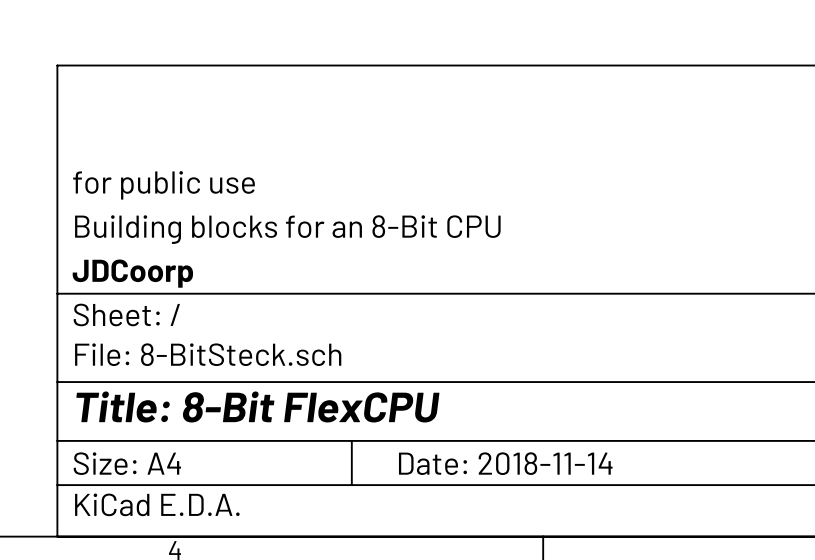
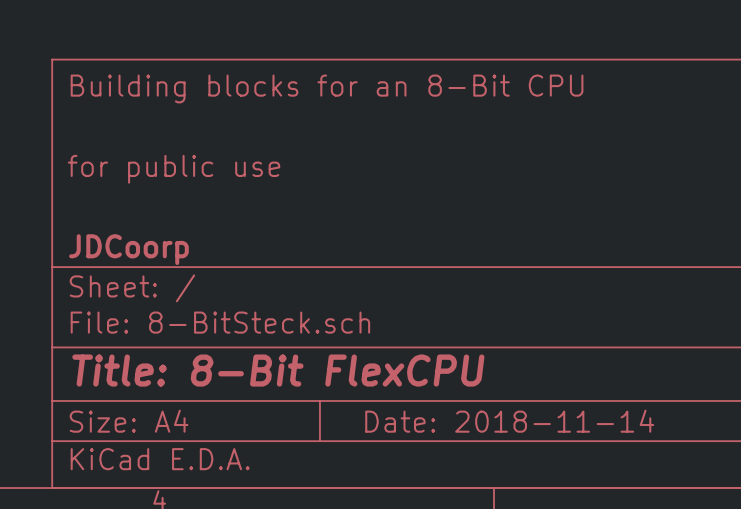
title block position: Building blocks for an 8-Bit CPU (287, 229) -> Building blocks for an 8-Bit CPU (327, 88)

